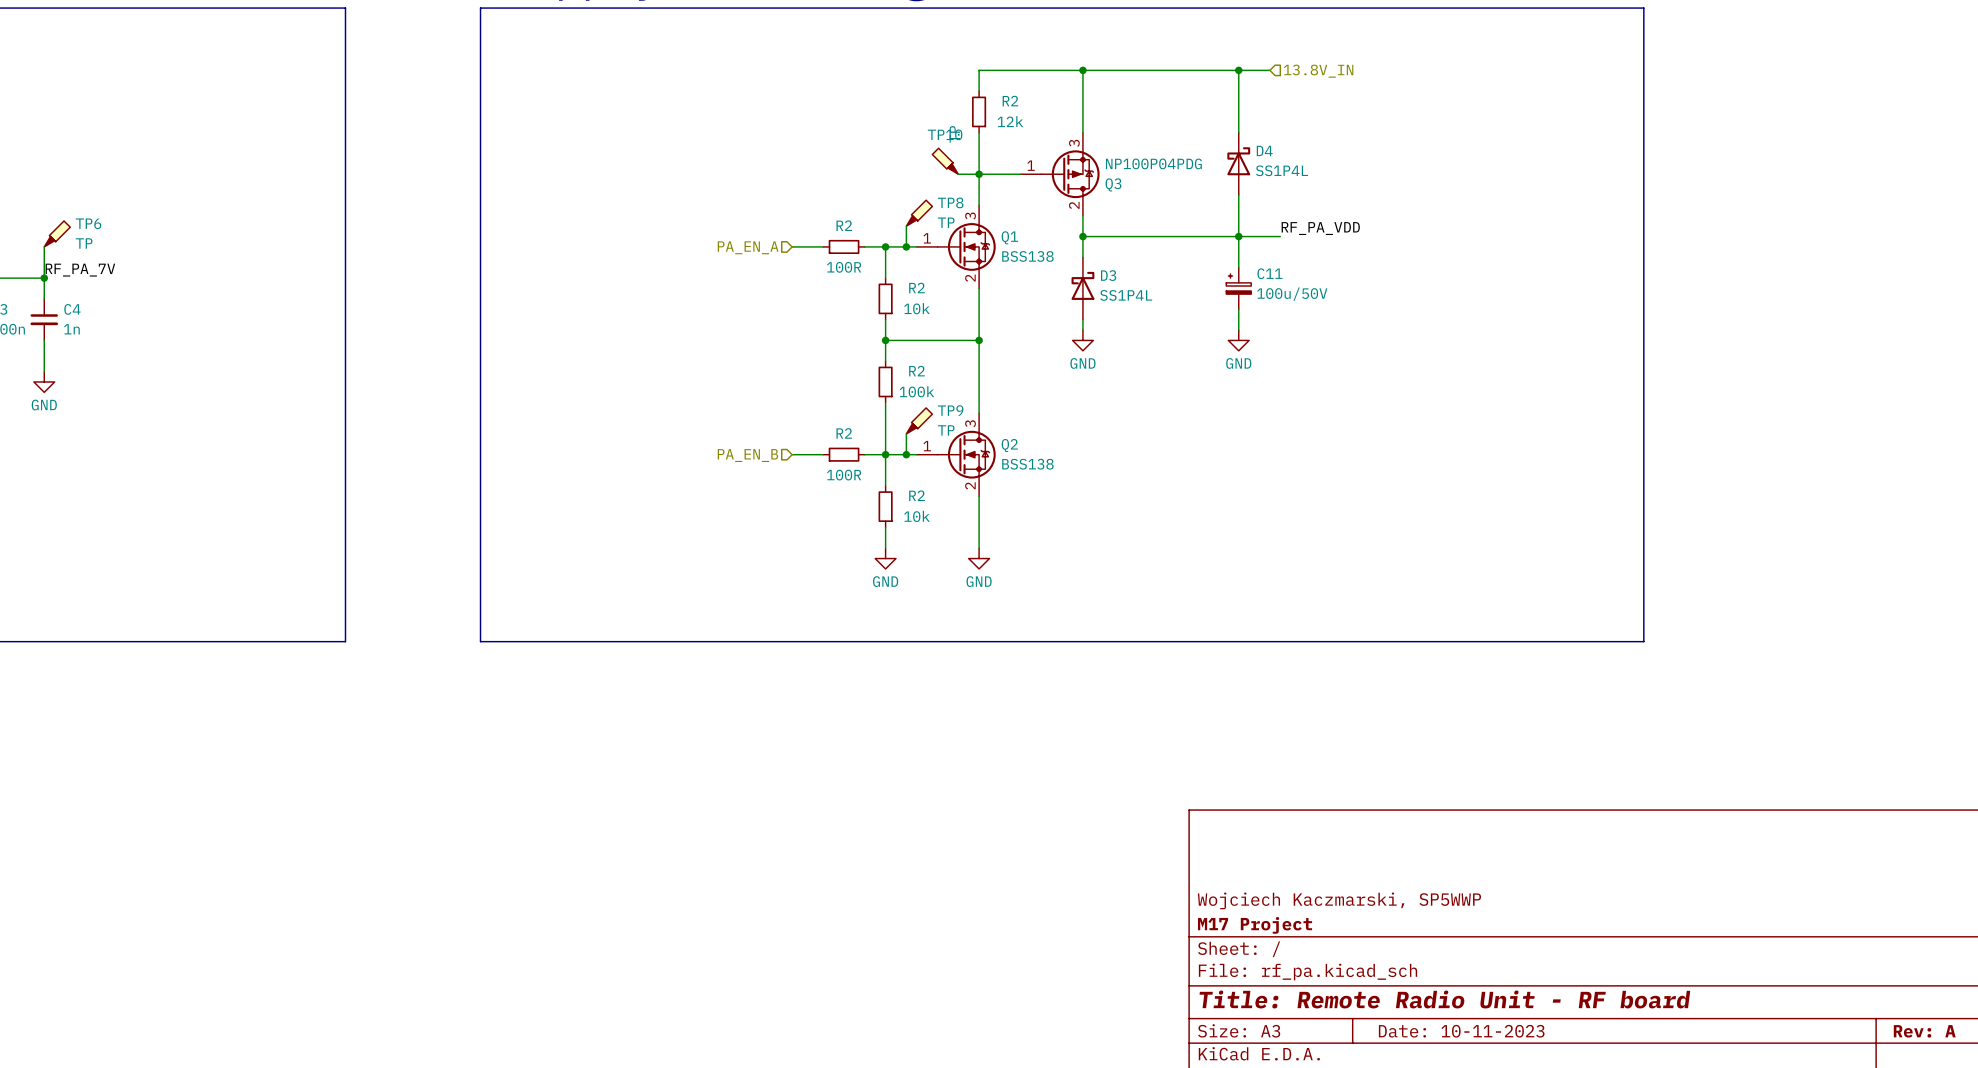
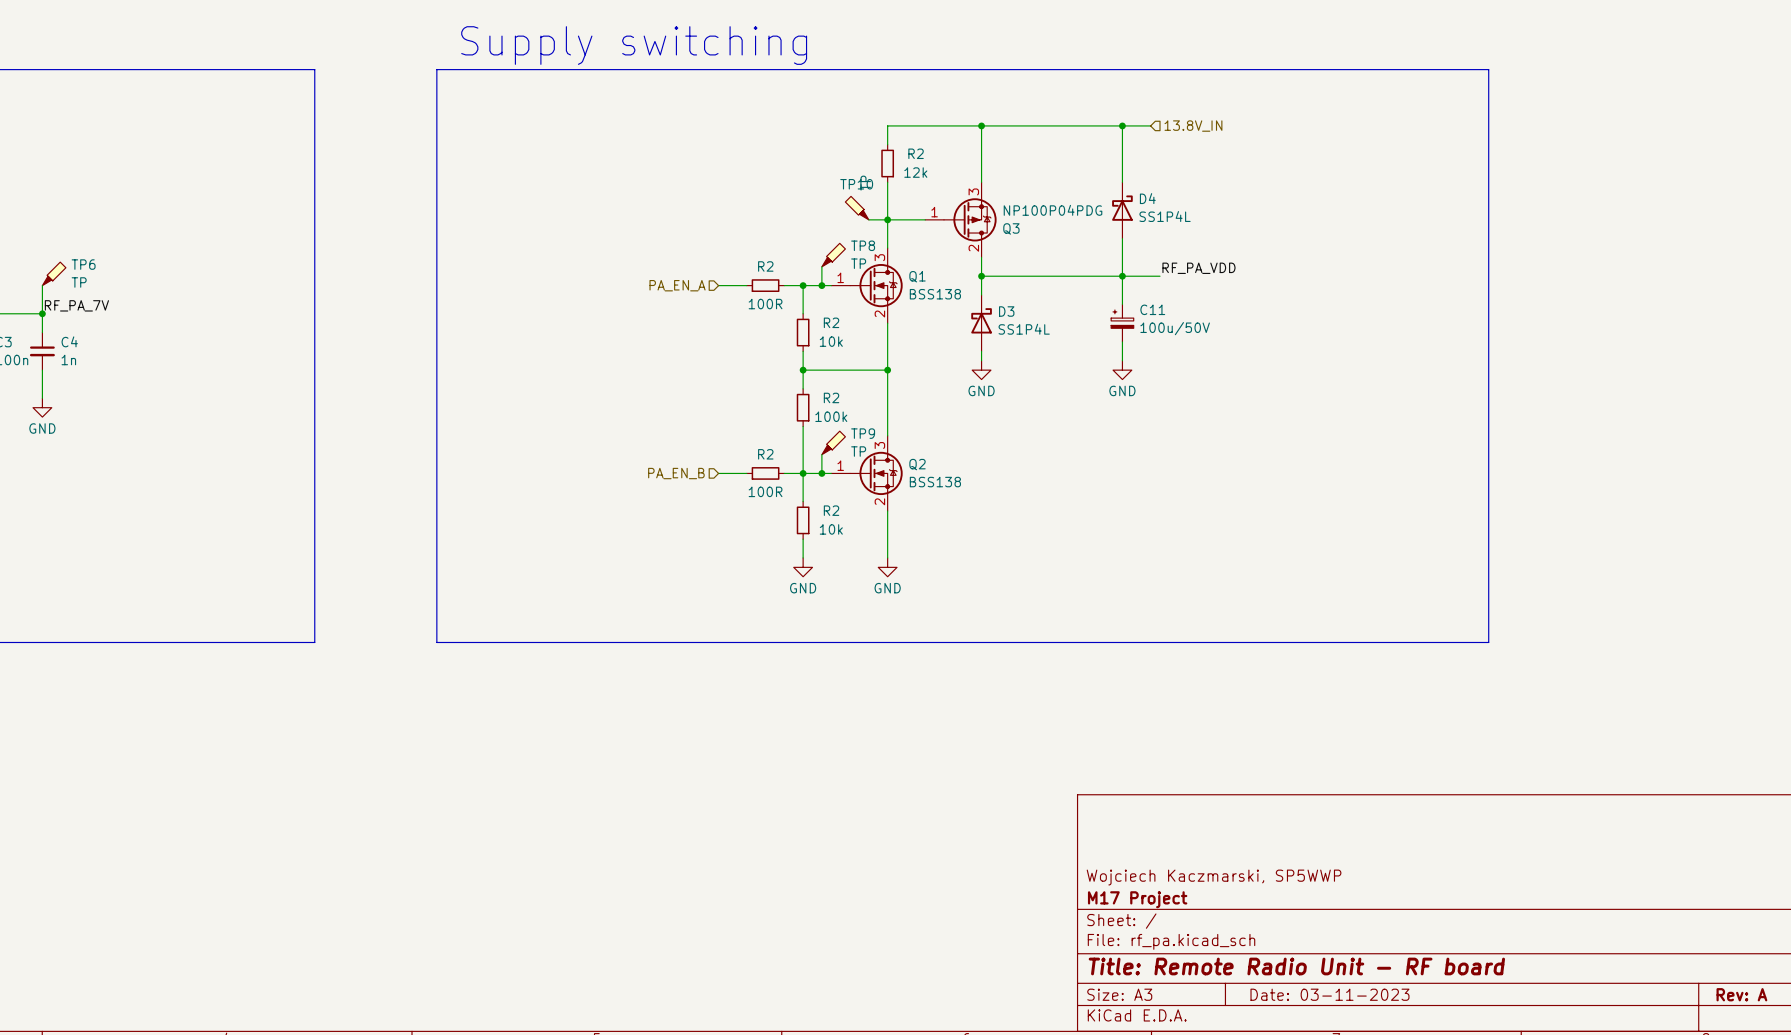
title block: Date: 10-11-2023 (1461, 1031) -> Date: 03-11-2023 (1329, 994)

